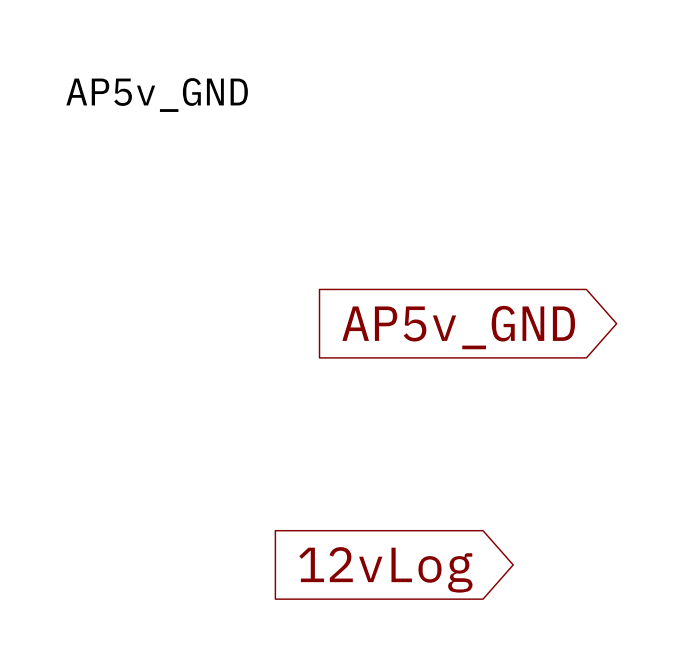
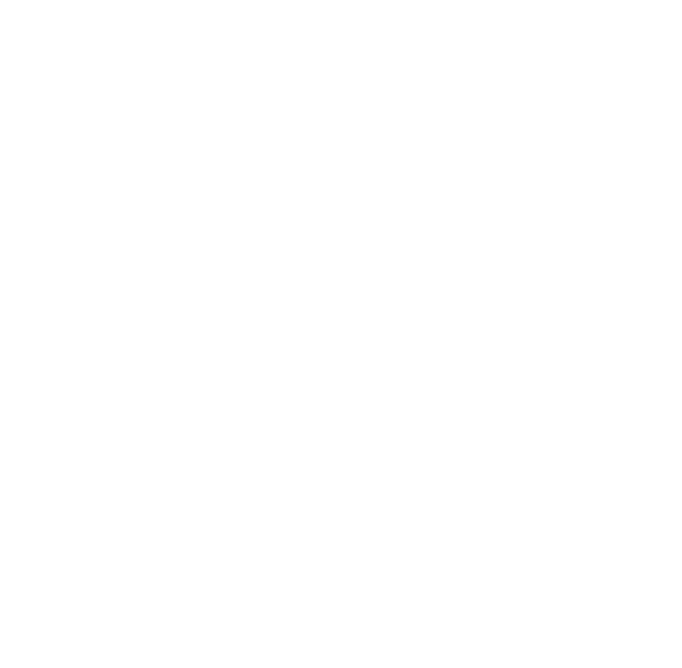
label: AP5v_GND (157, 95) -> none
global label: AP5v_GND (458, 327) -> none
global label: 12vLog (385, 569) -> none

